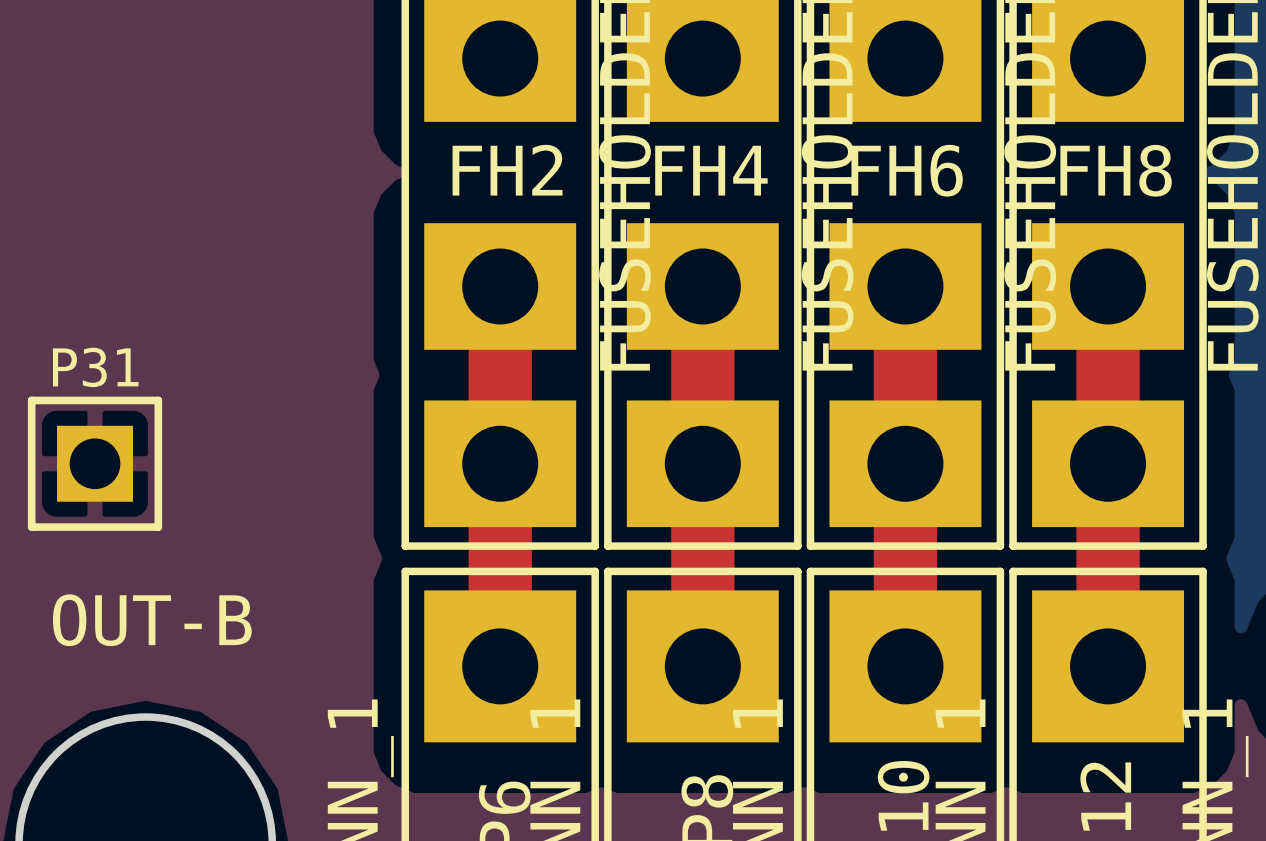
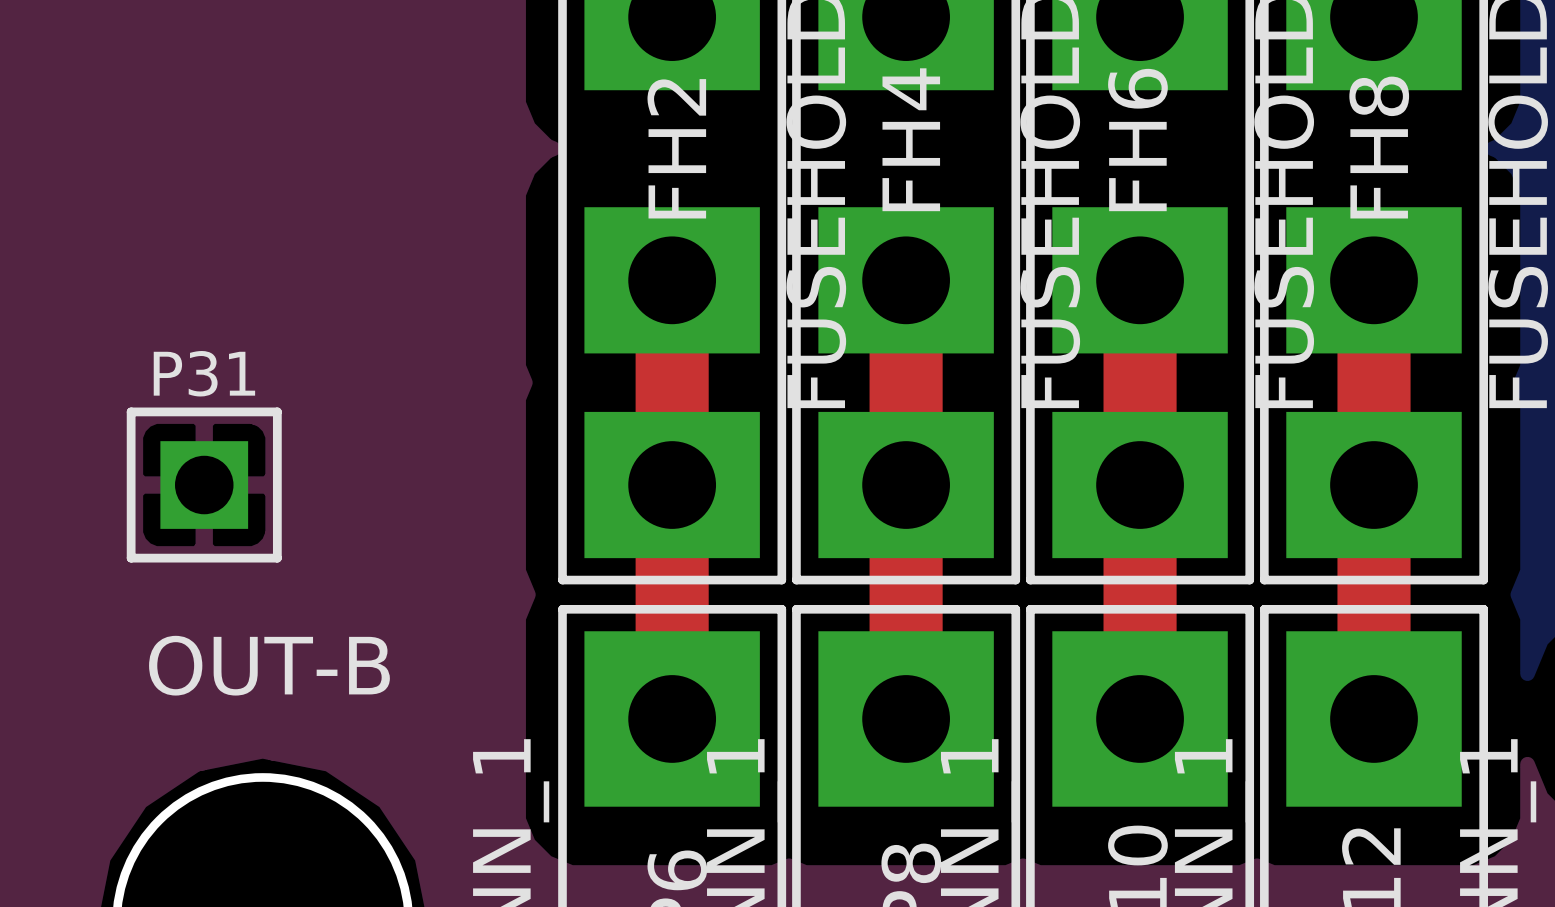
FH2 name rotation: 0° (507, 170) -> 90° counterclockwise (676, 148)
FH4 name rotation: 0° (711, 170) -> 90° counterclockwise (911, 139)
FH6 name rotation: 0° (907, 170) -> 90° counterclockwise (1137, 140)
FH8 name rotation: 0° (1116, 170) -> 90° counterclockwise (1379, 147)

